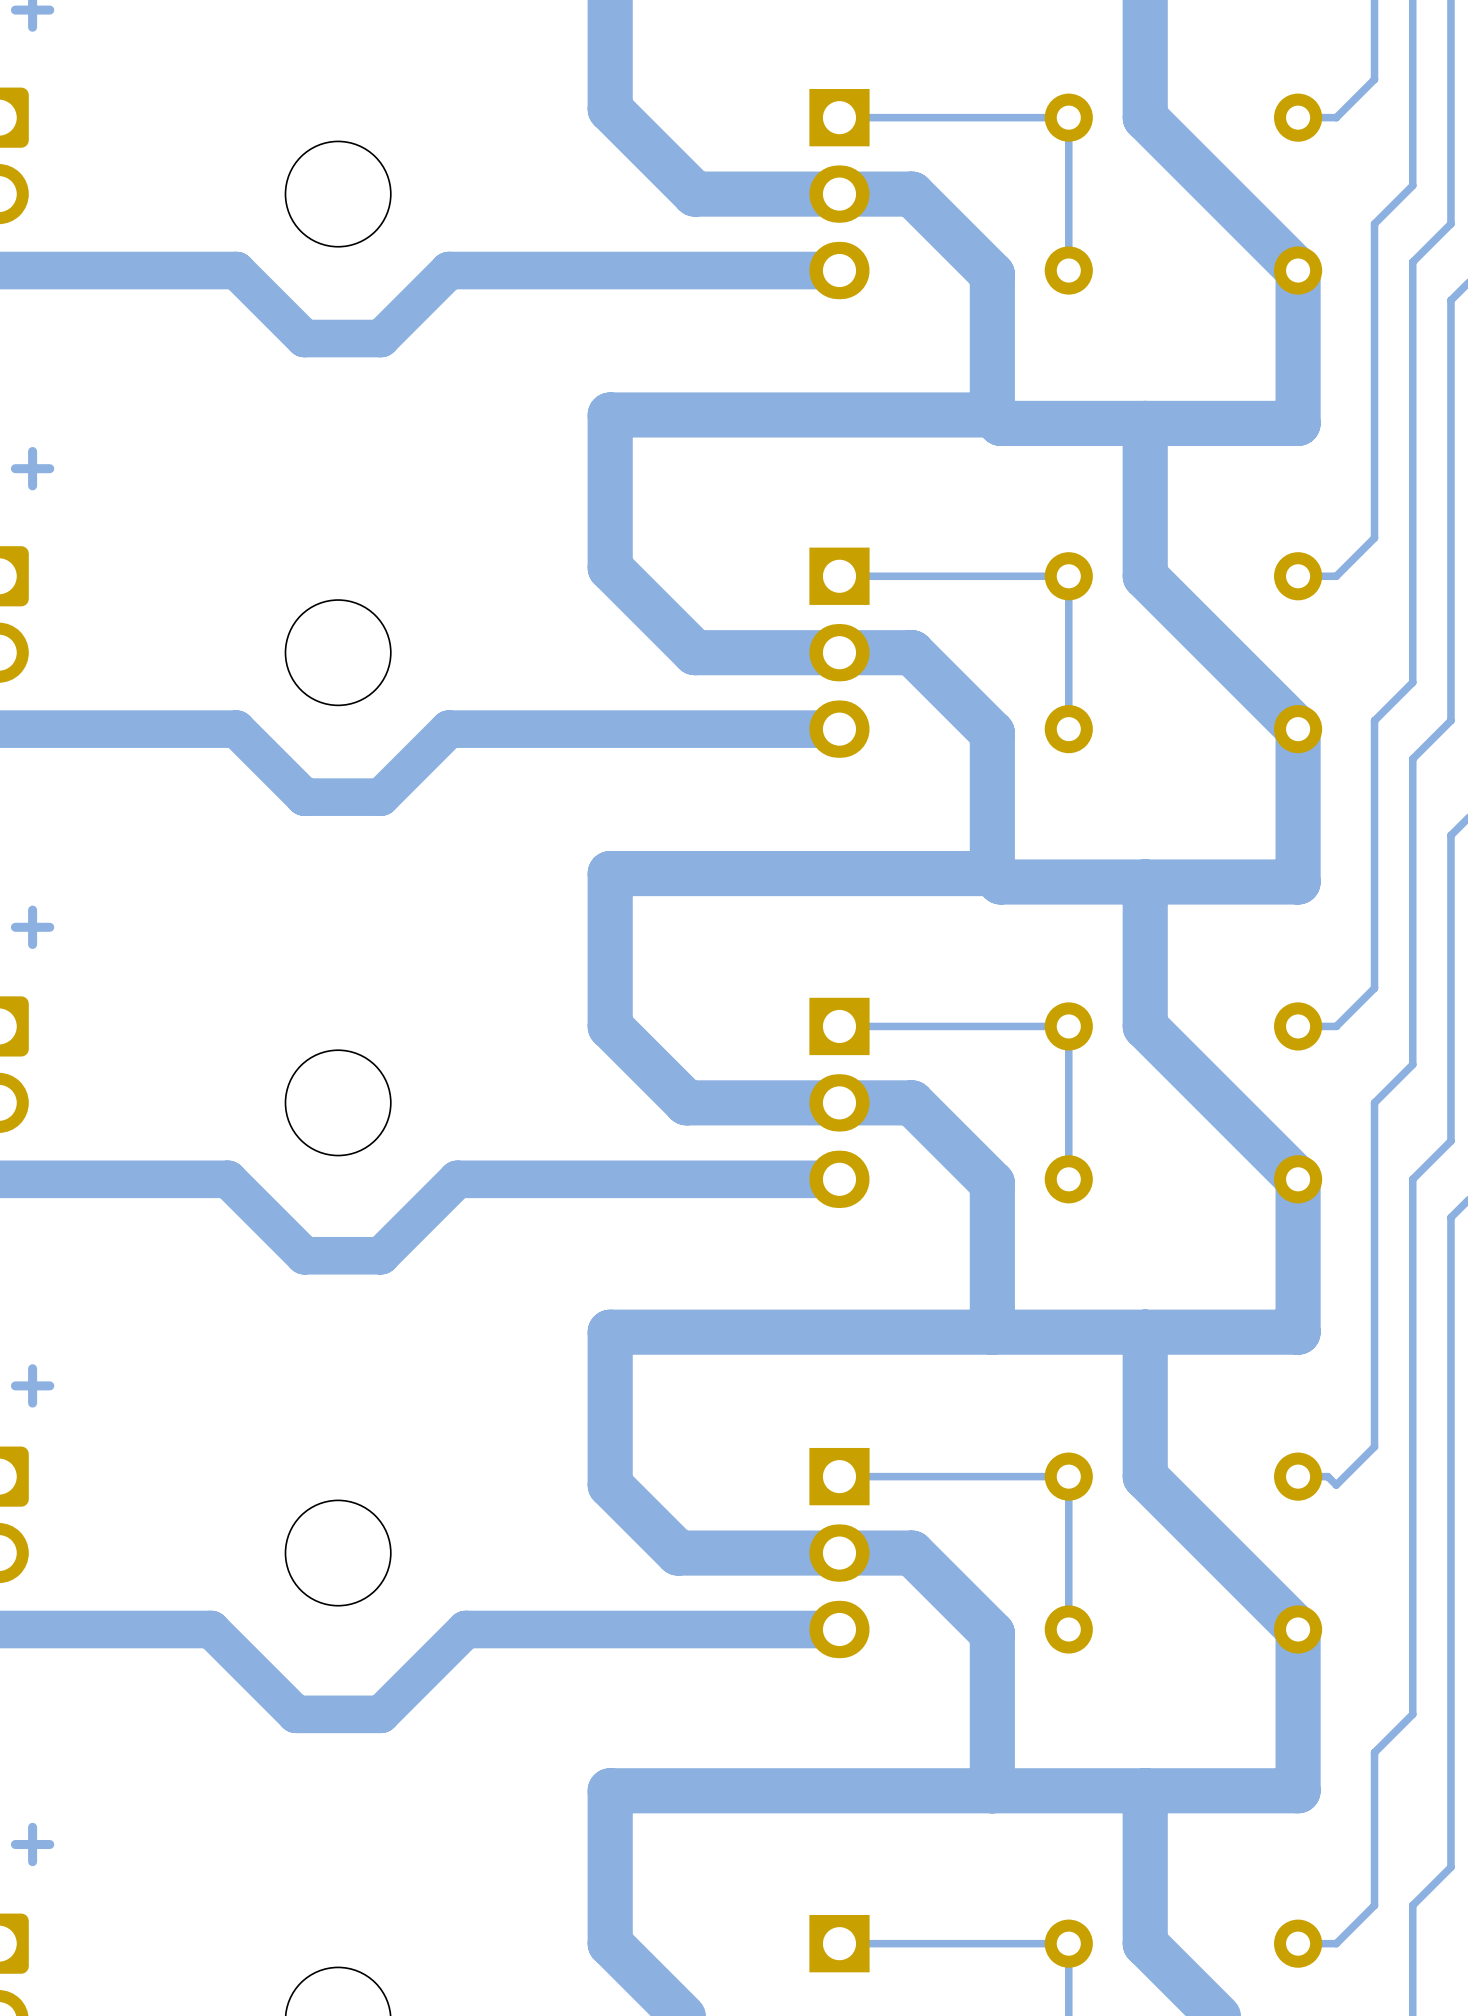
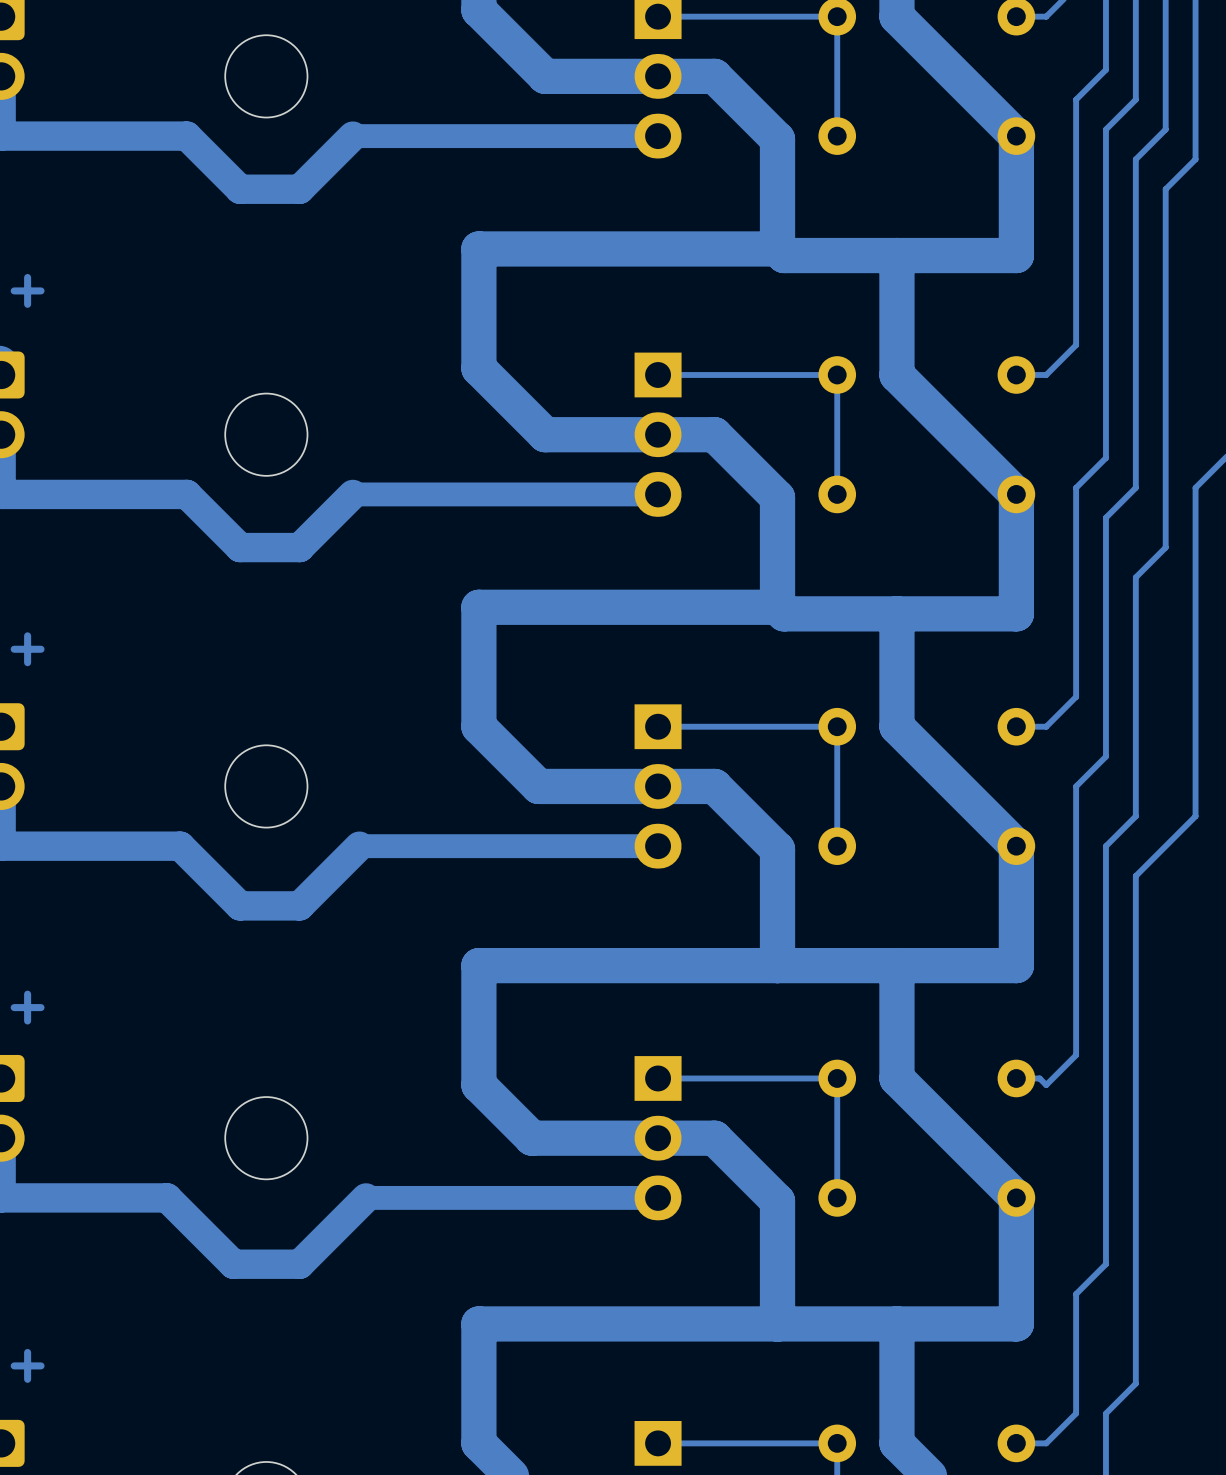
track width: thick (839, 270) (448, 270) -> thin (658, 136) (352, 136)
track width: thick (839, 729) (448, 729) -> thin (658, 494) (352, 494)
track width: thick (839, 1179) (457, 1179) -> thin (658, 846) (359, 846)
track width: thick (839, 1629) (465, 1629) -> thin (658, 1197) (366, 1197)

